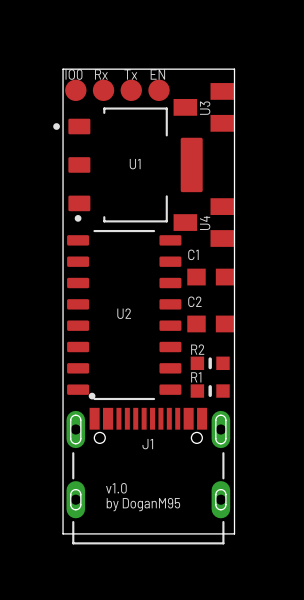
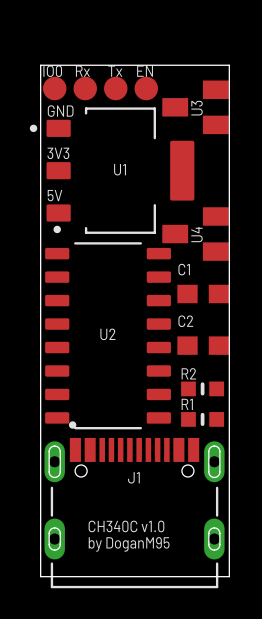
text: none -> GND (60, 111)
text: none -> 3V3 (58, 153)
text: none -> 5V (54, 195)
text: v1.0 (116, 488) -> CH340C v1.0 (126, 526)

